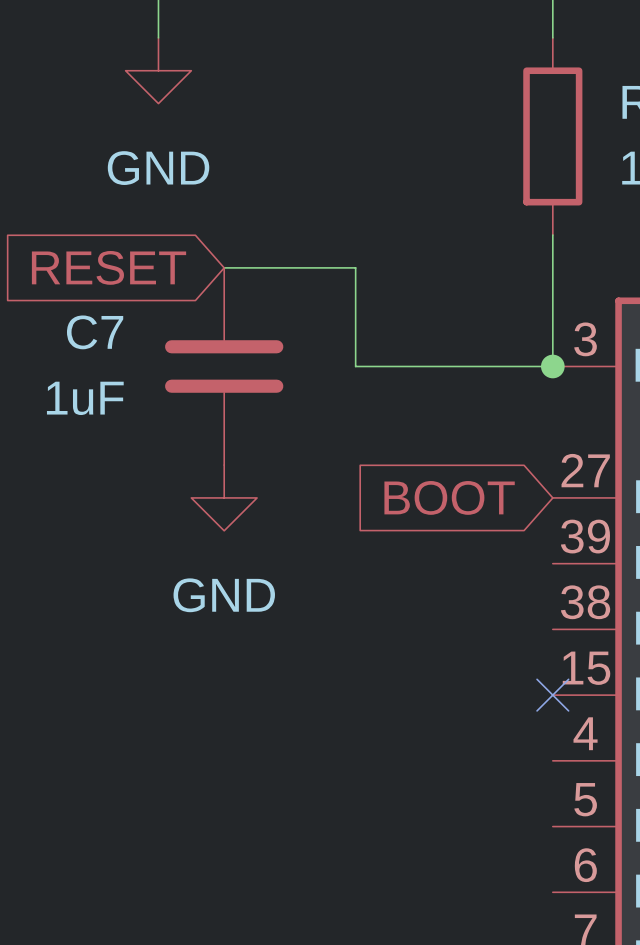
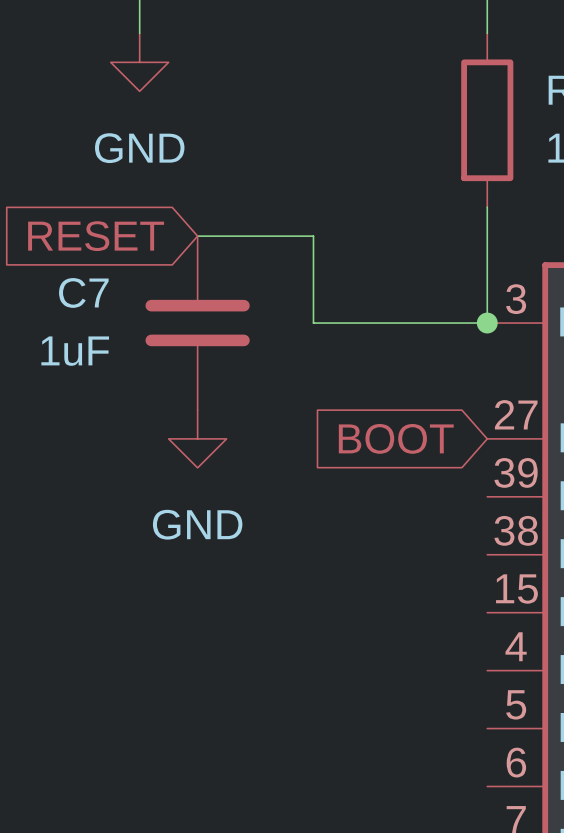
no-connect mark: (552, 695) -> none

